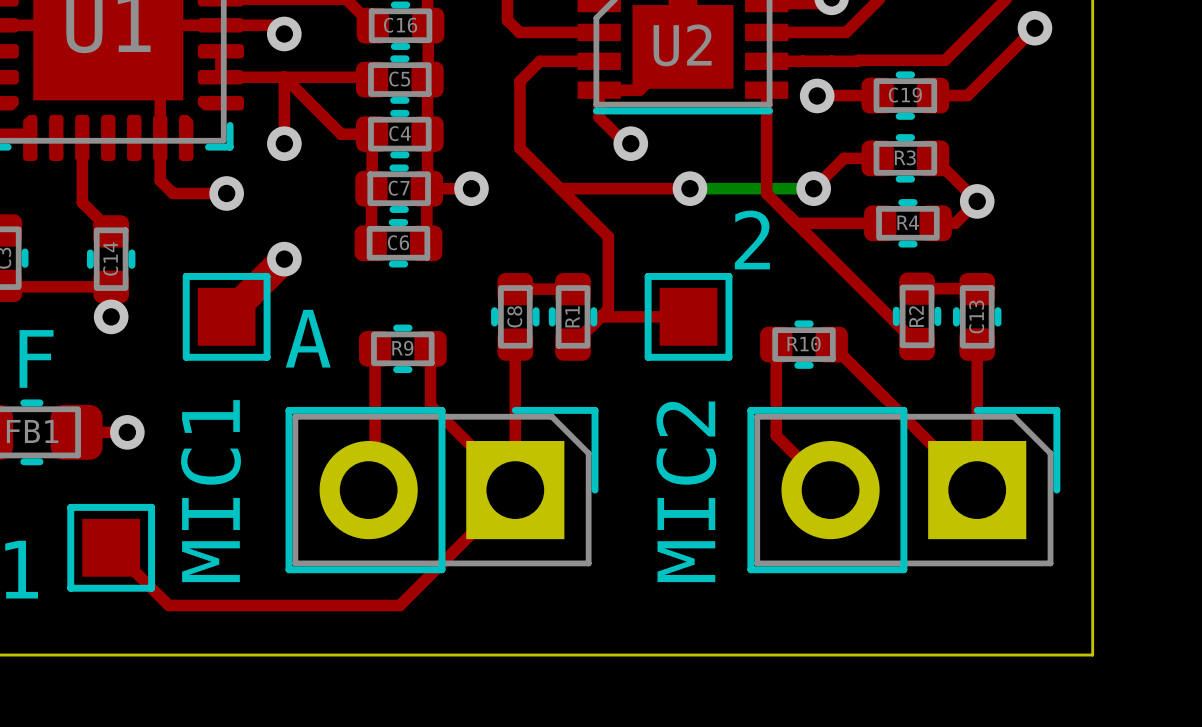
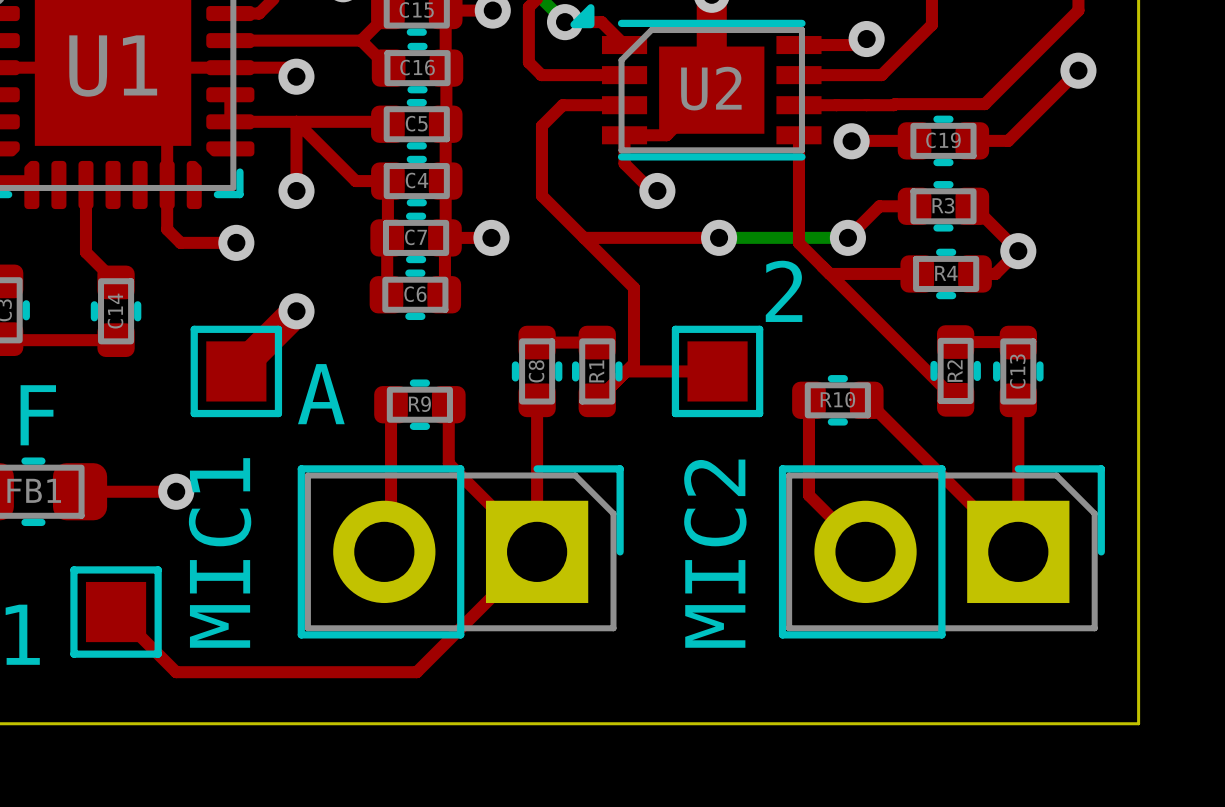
via: (111, 316) -> none
top track: none -> (132, 491) (176, 491)
via position: (127, 432) -> (176, 491)

